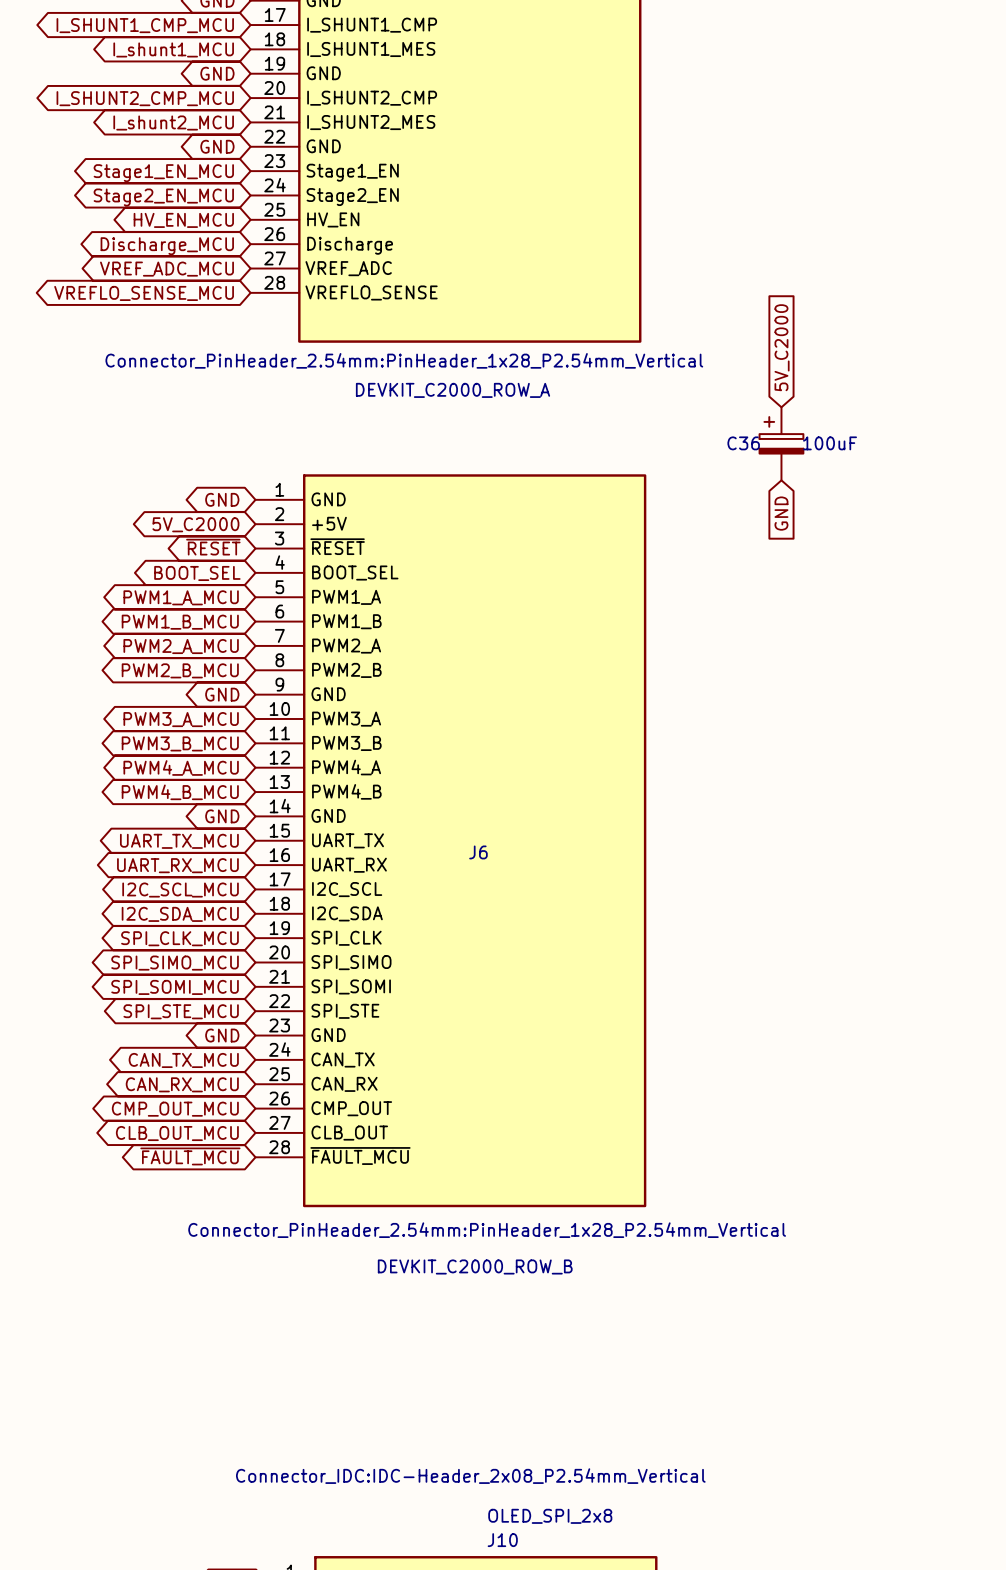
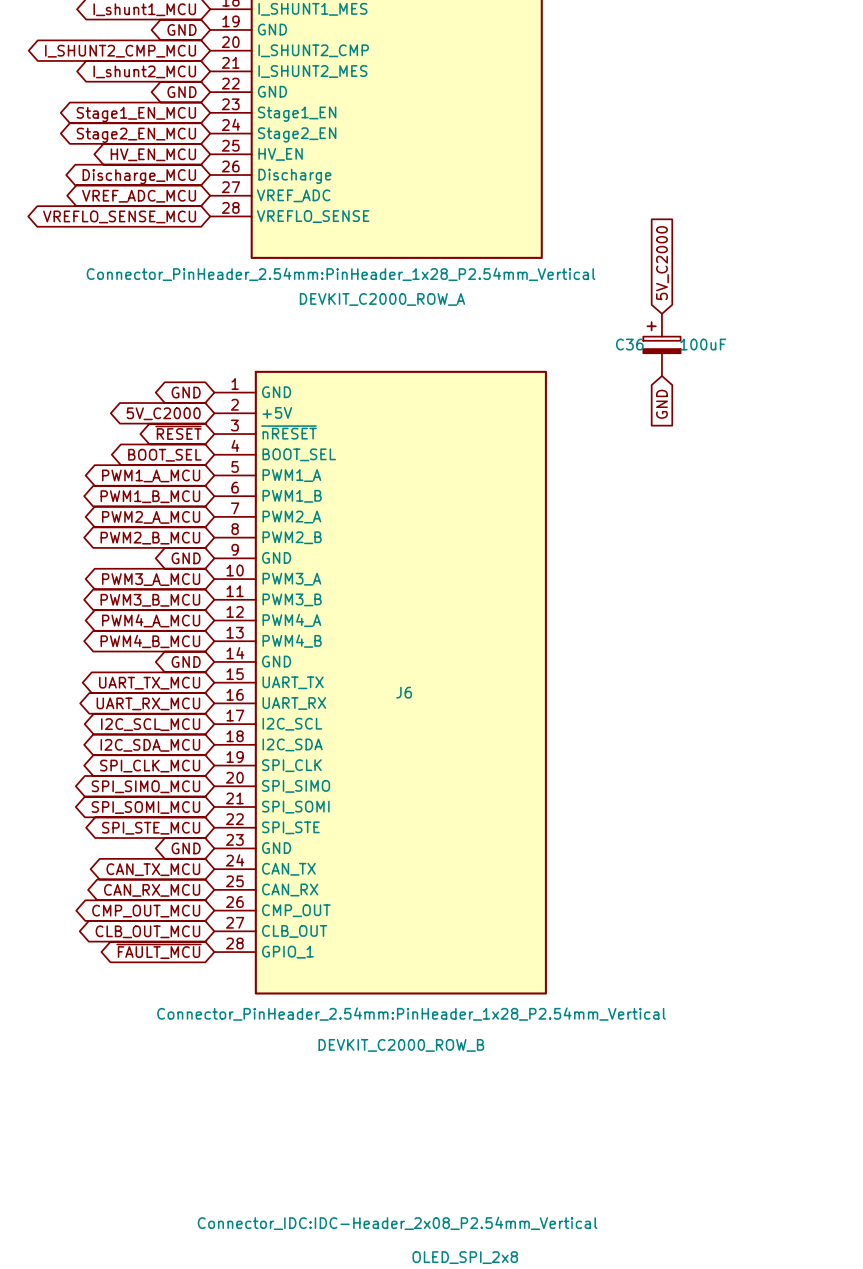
J6 pin name: ~{RESET} (337, 546) -> ~{nRESET} (288, 432)
J6 pin name: ~{FAULT_MCU} (360, 1156) -> GPIO_1 (287, 952)

